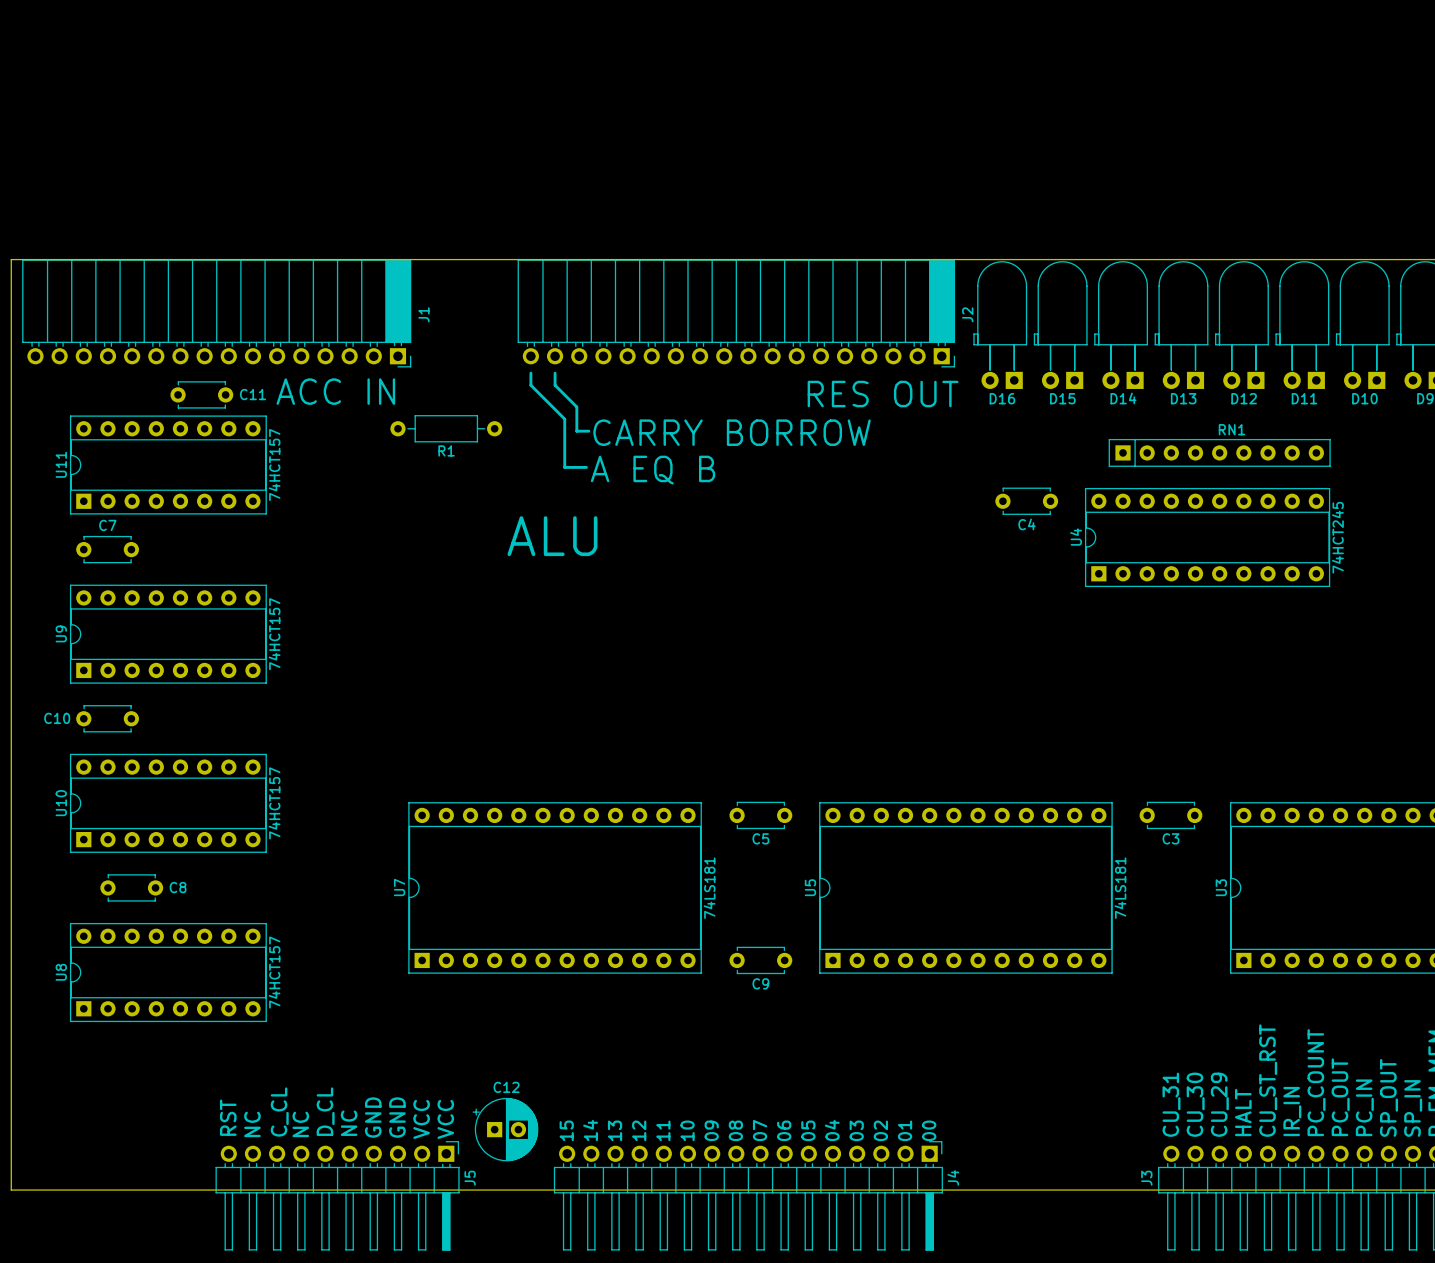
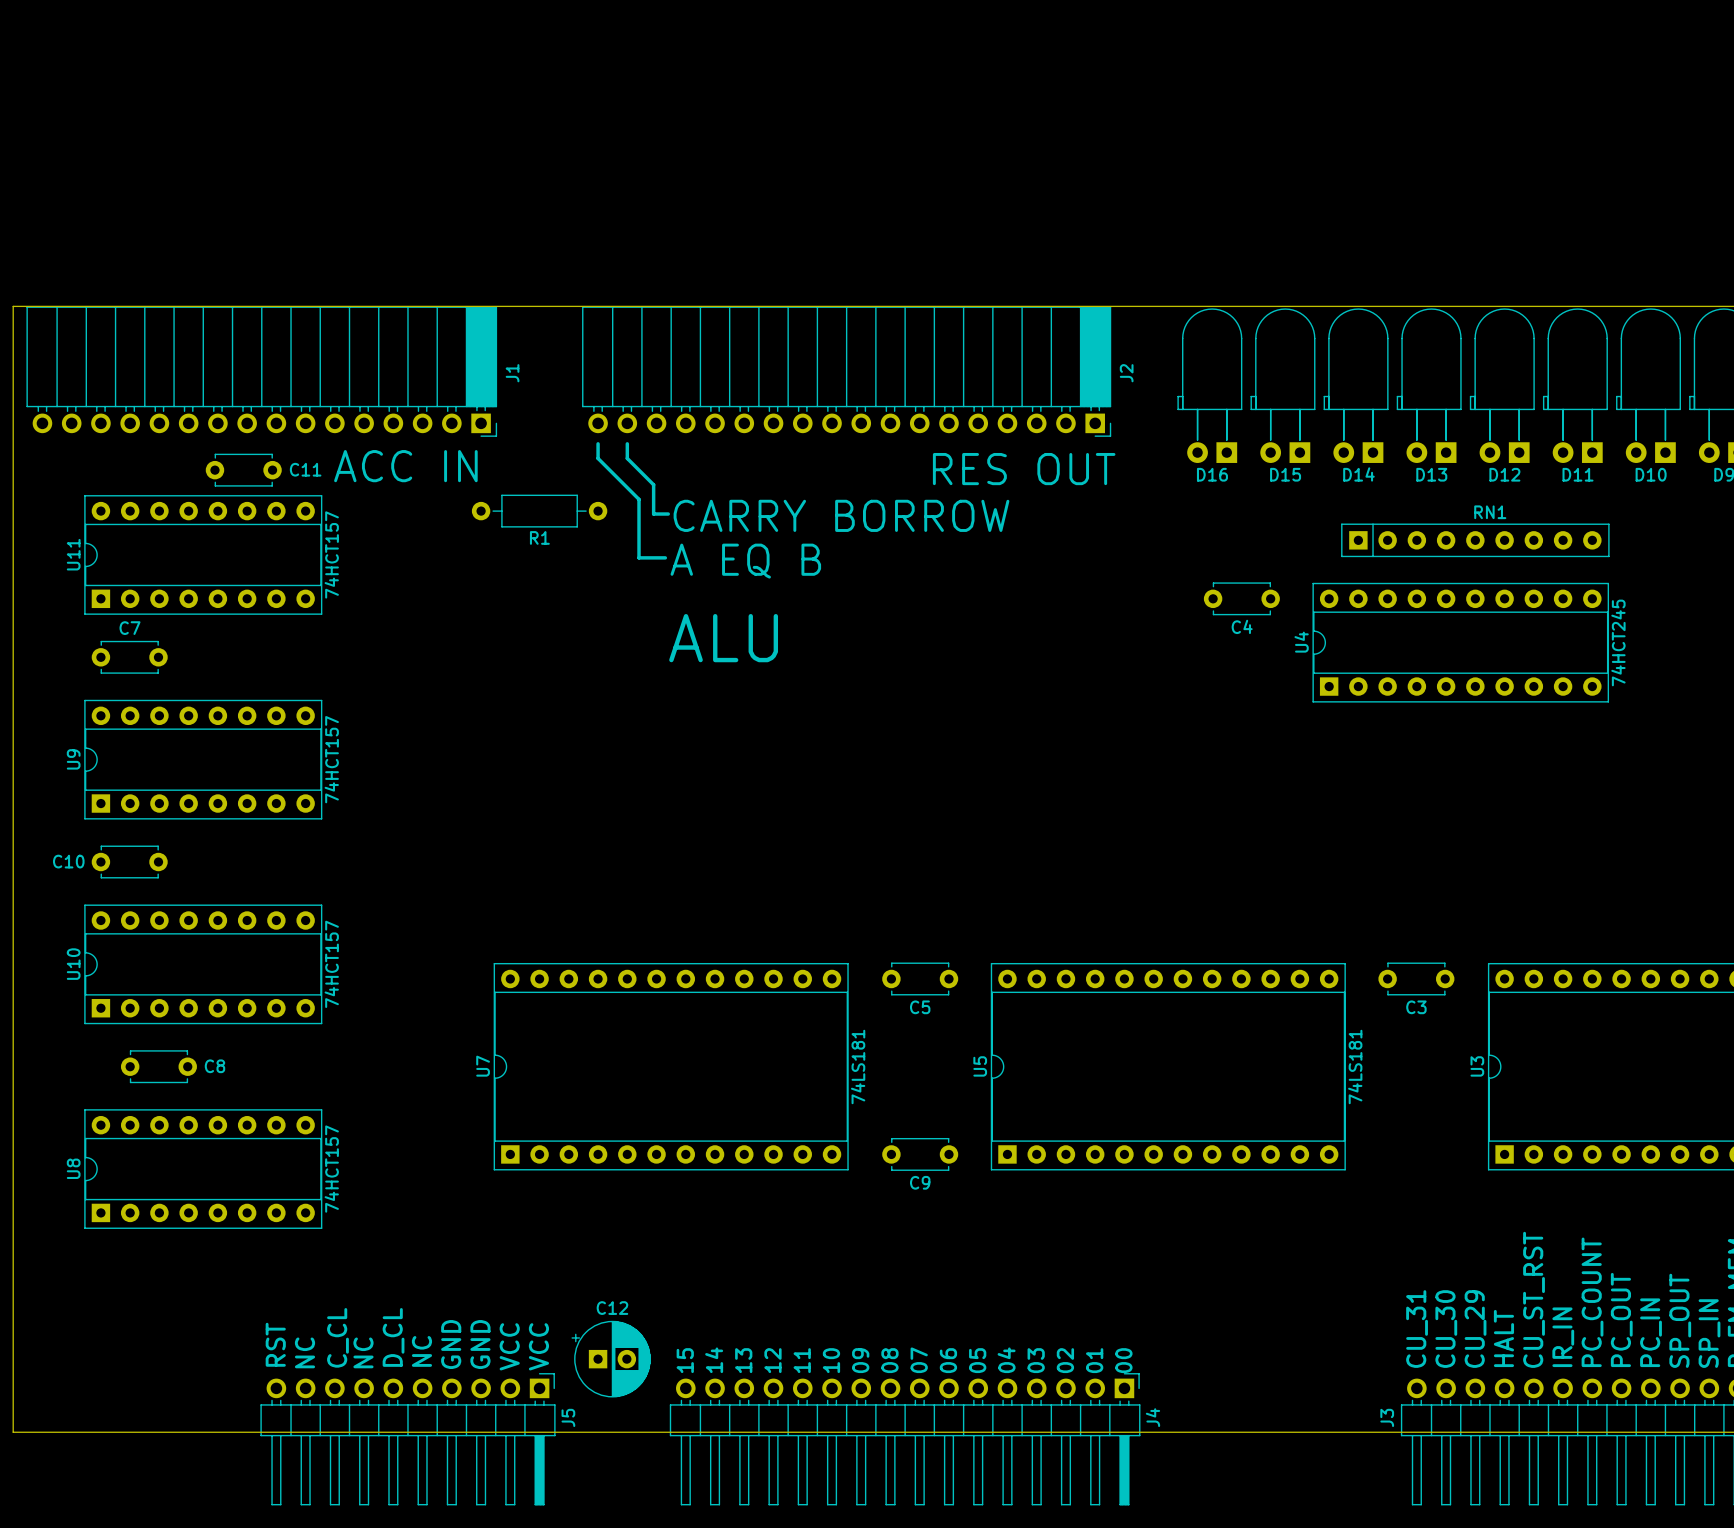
J2 position: (736, 313) -> (846, 371)
line: (530, 373) (530, 385) (564, 419) (564, 467) (586, 467) -> (598, 443) (598, 458) (639, 499) (639, 557) (665, 557)
line: (555, 373) (555, 385) (576, 407) (576, 431) (588, 431) -> (627, 443) (627, 458) (653, 484) (653, 514) (668, 514)
text position: RES OUT (883, 394) -> RES OUT (1024, 469)
text position: CARRY BORROW (732, 432) -> CARRY BORROW (841, 515)
text position: A EQ B (653, 470) -> A EQ B (745, 561)
text position: ALU (552, 536) -> ALU (723, 638)

